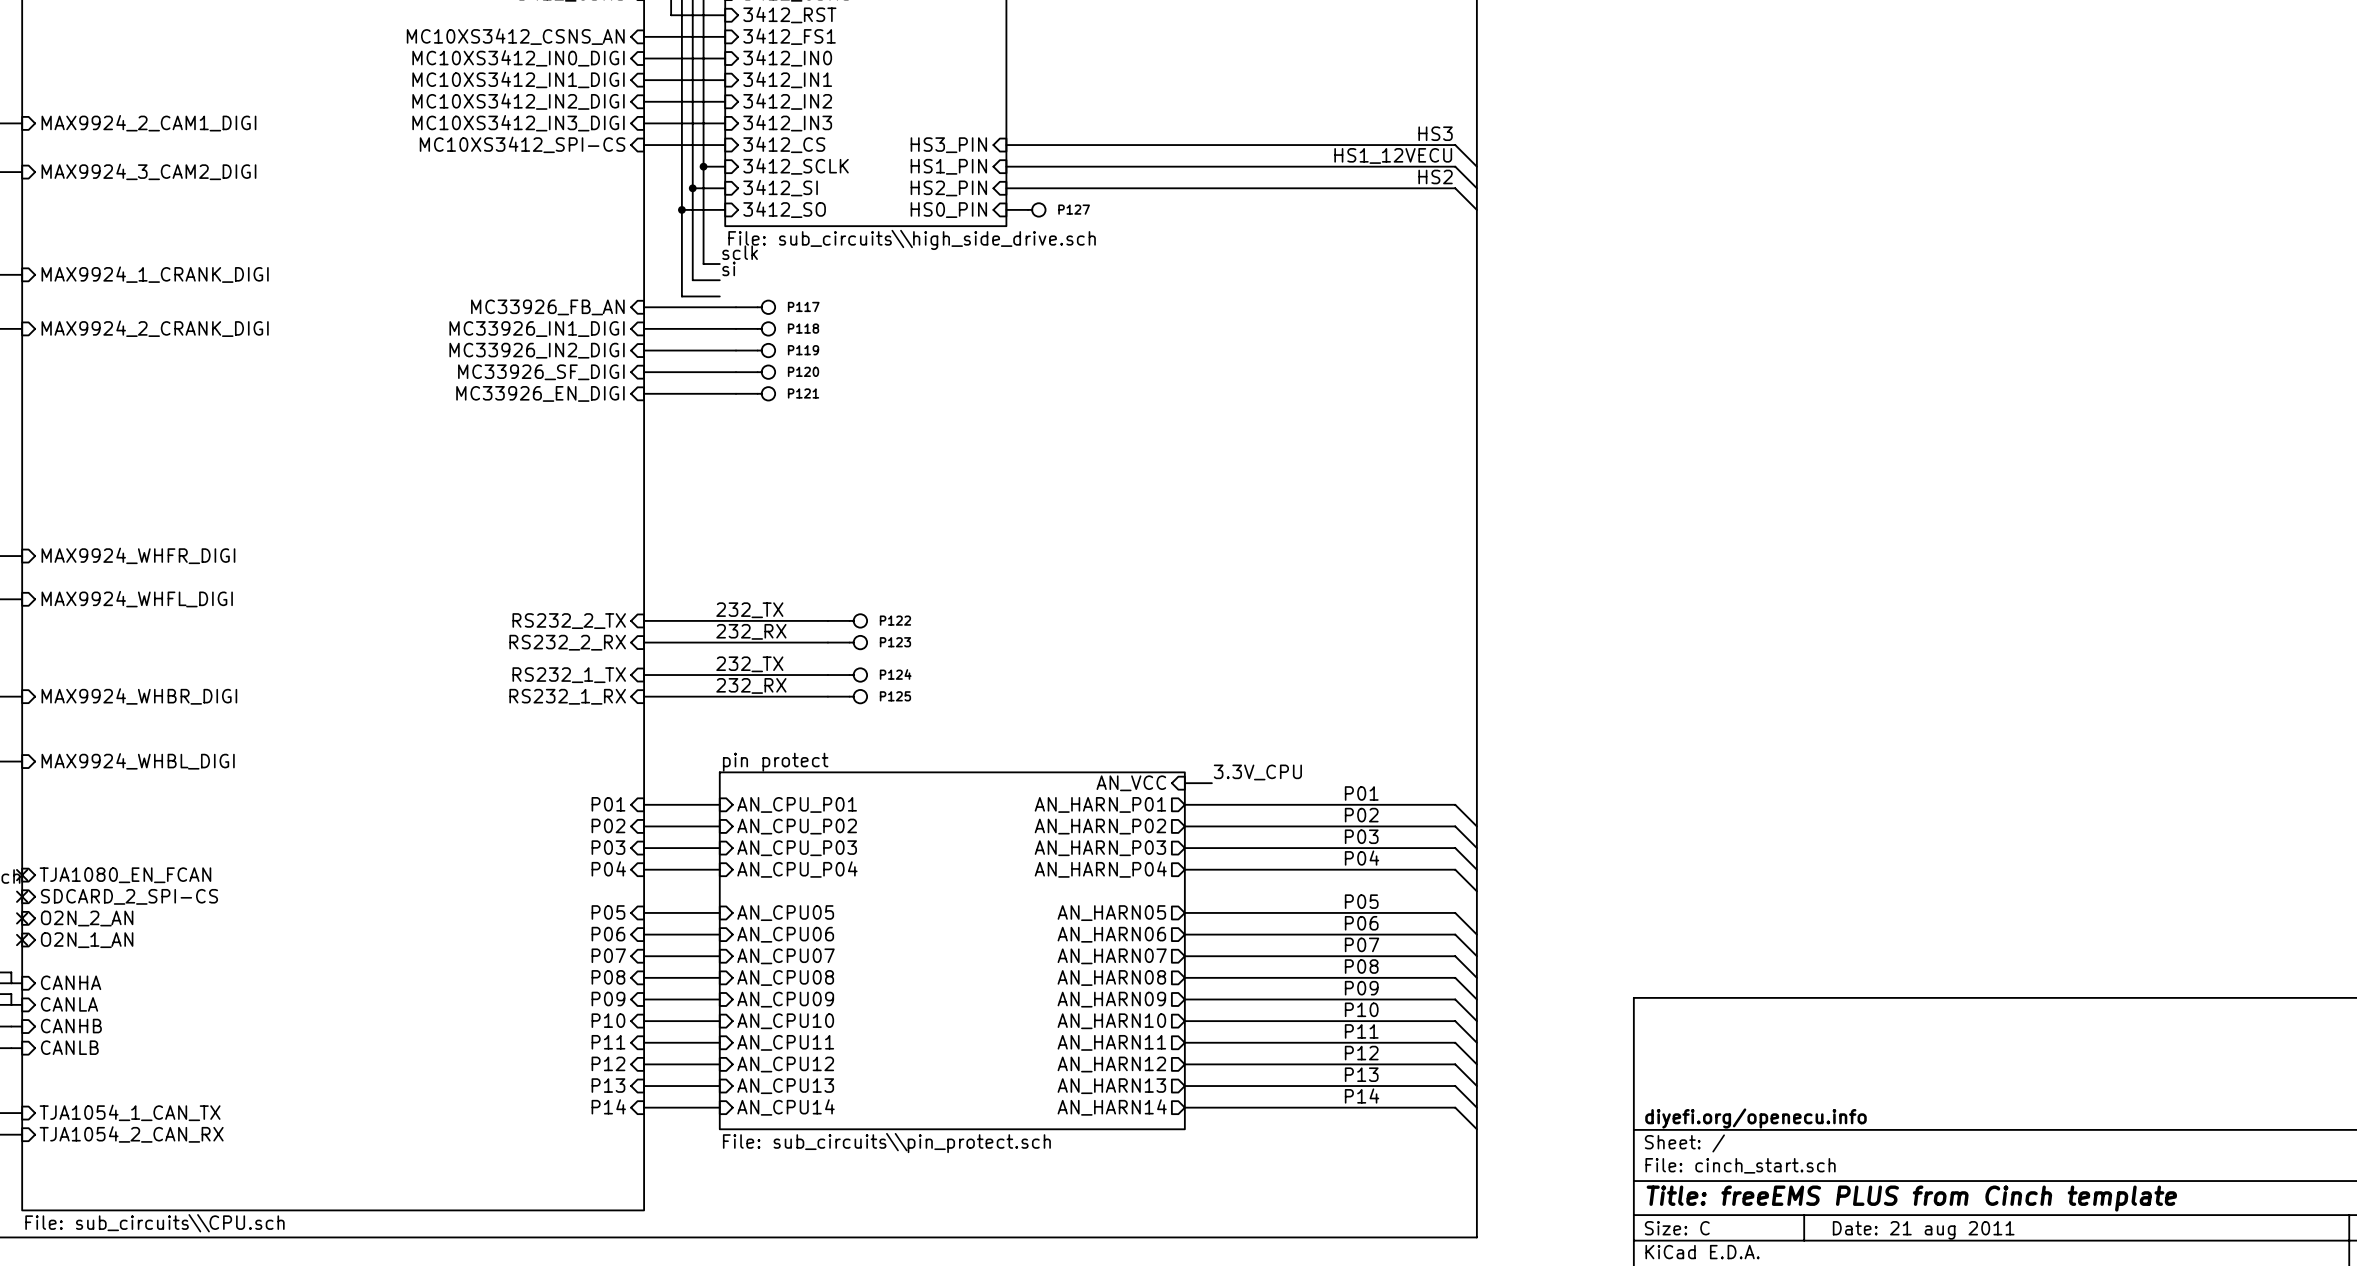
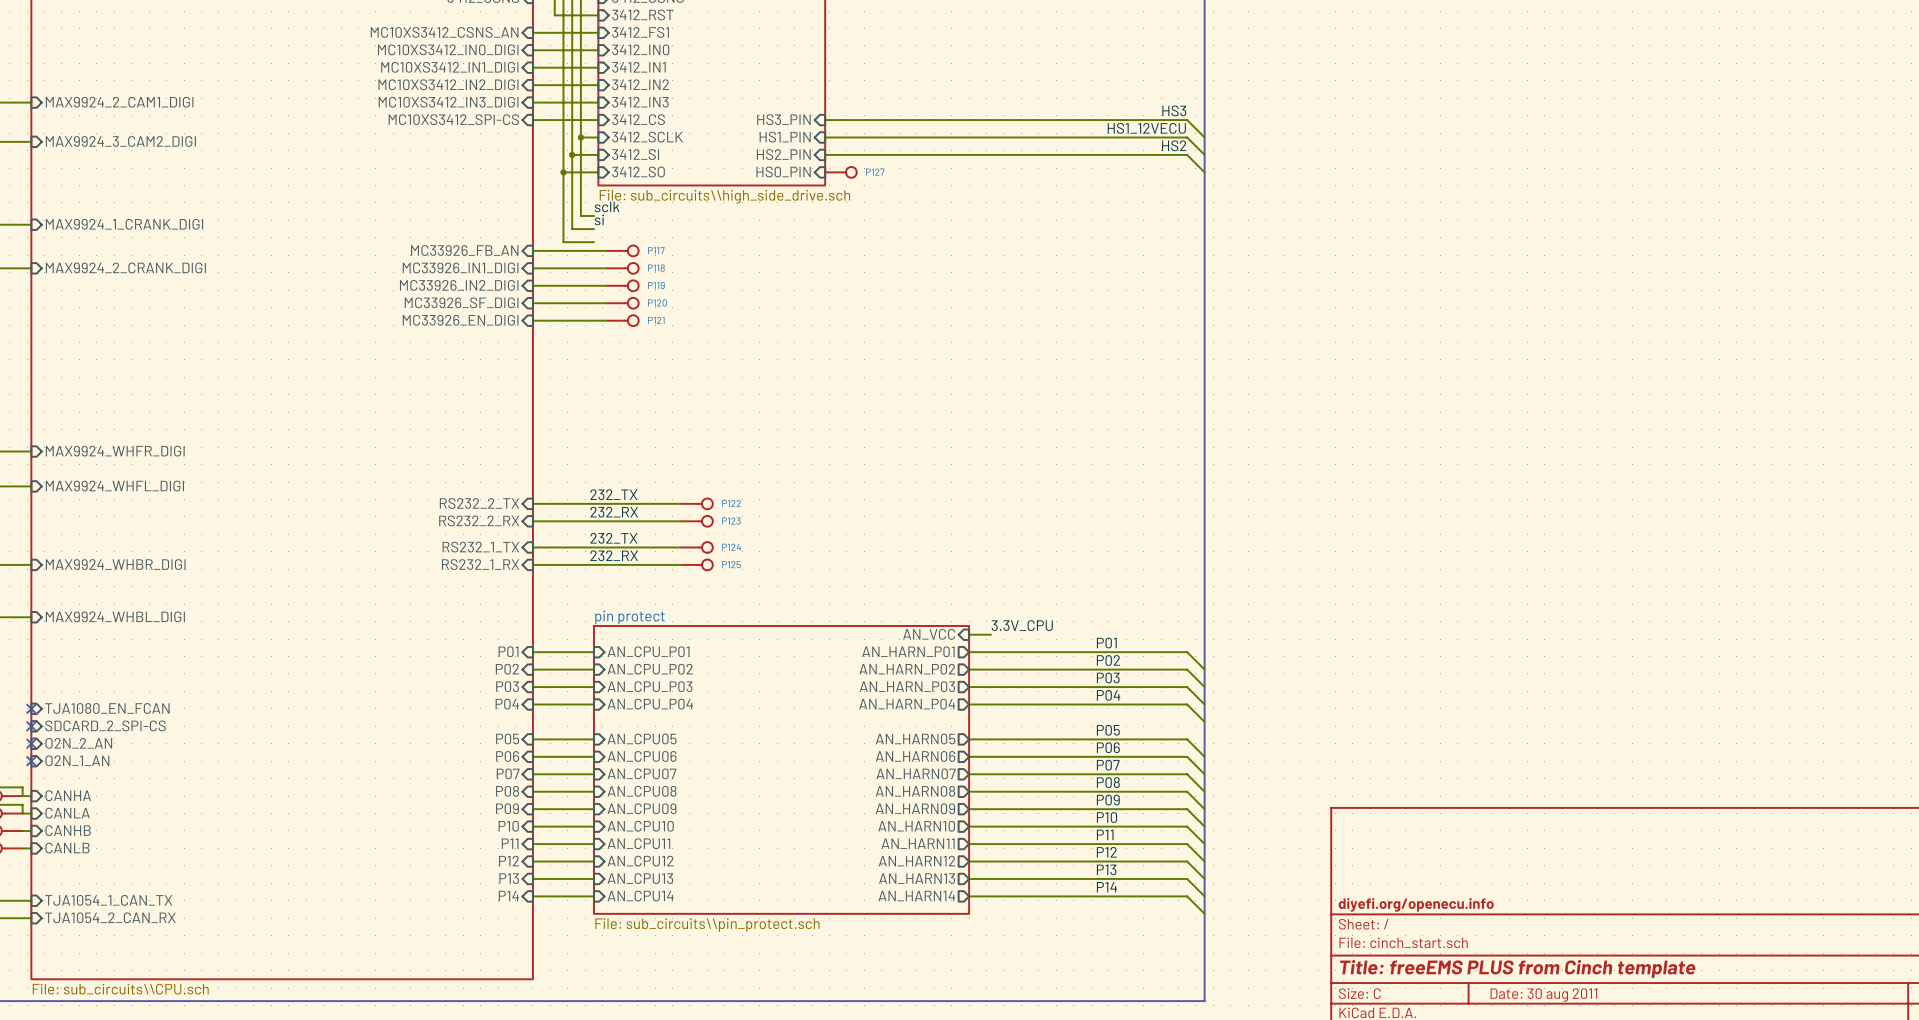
title block: Date: 21 aug 2011 (1923, 1230) -> Date: 30 aug 2011 (1543, 995)

